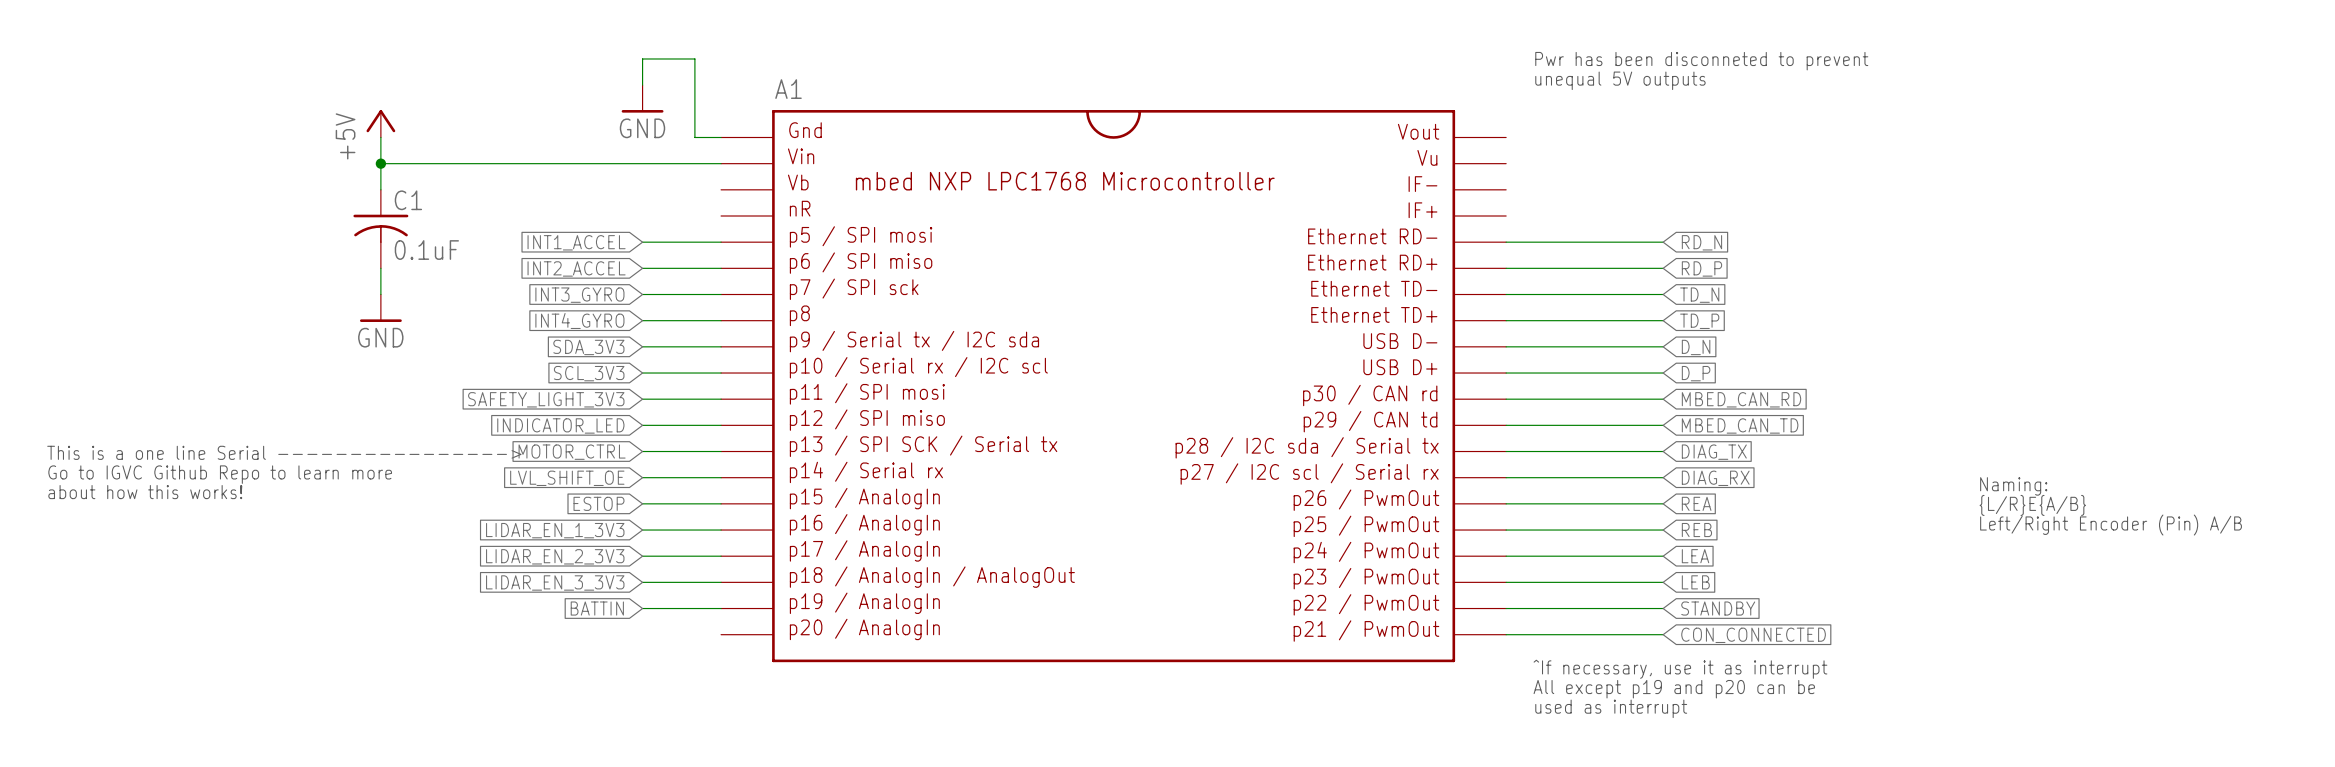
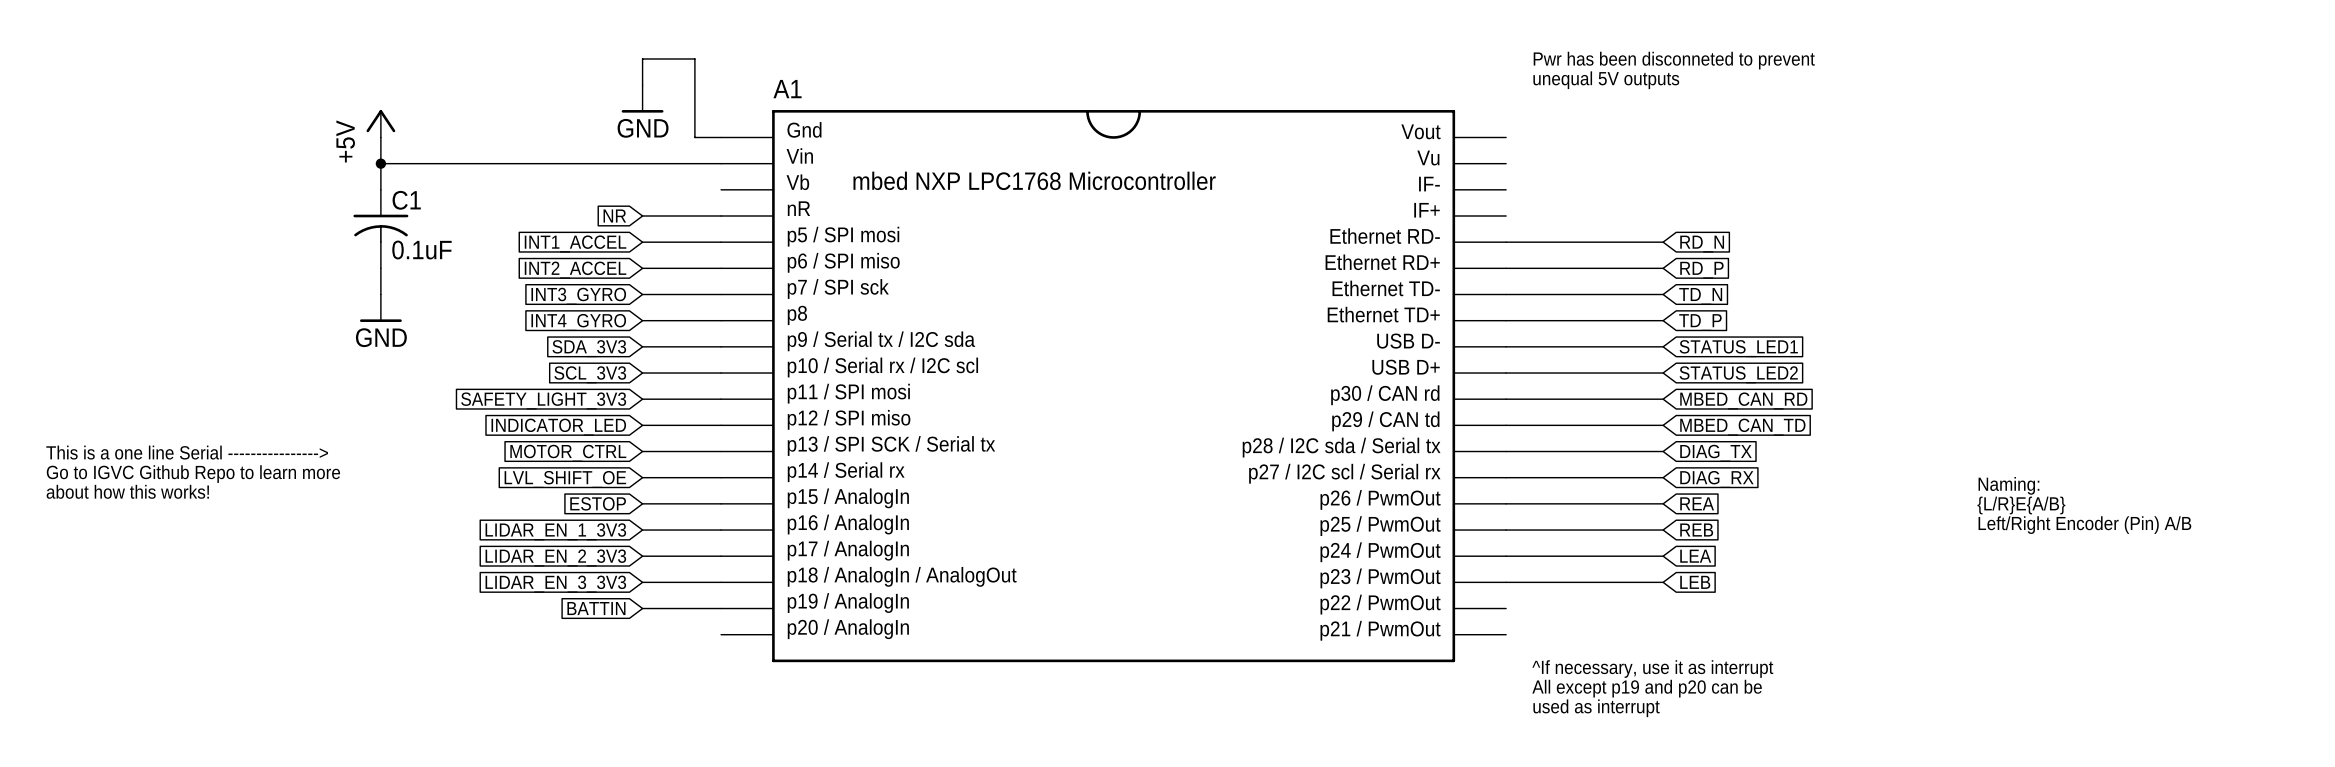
global label: none -> NR (614, 216)
wire: none -> (642, 216) (721, 216)
global label: D_N (1696, 347) -> STATUS_LED1 (1738, 348)
global label: D_P (1696, 373) -> STATUS_LED2 (1738, 374)
wire: (1506, 608) (1663, 608) -> none
global label: STANDBY (1718, 608) -> none
wire: (1506, 634) (1663, 634) -> none
global label: CON_CONNECTED (1753, 635) -> none

